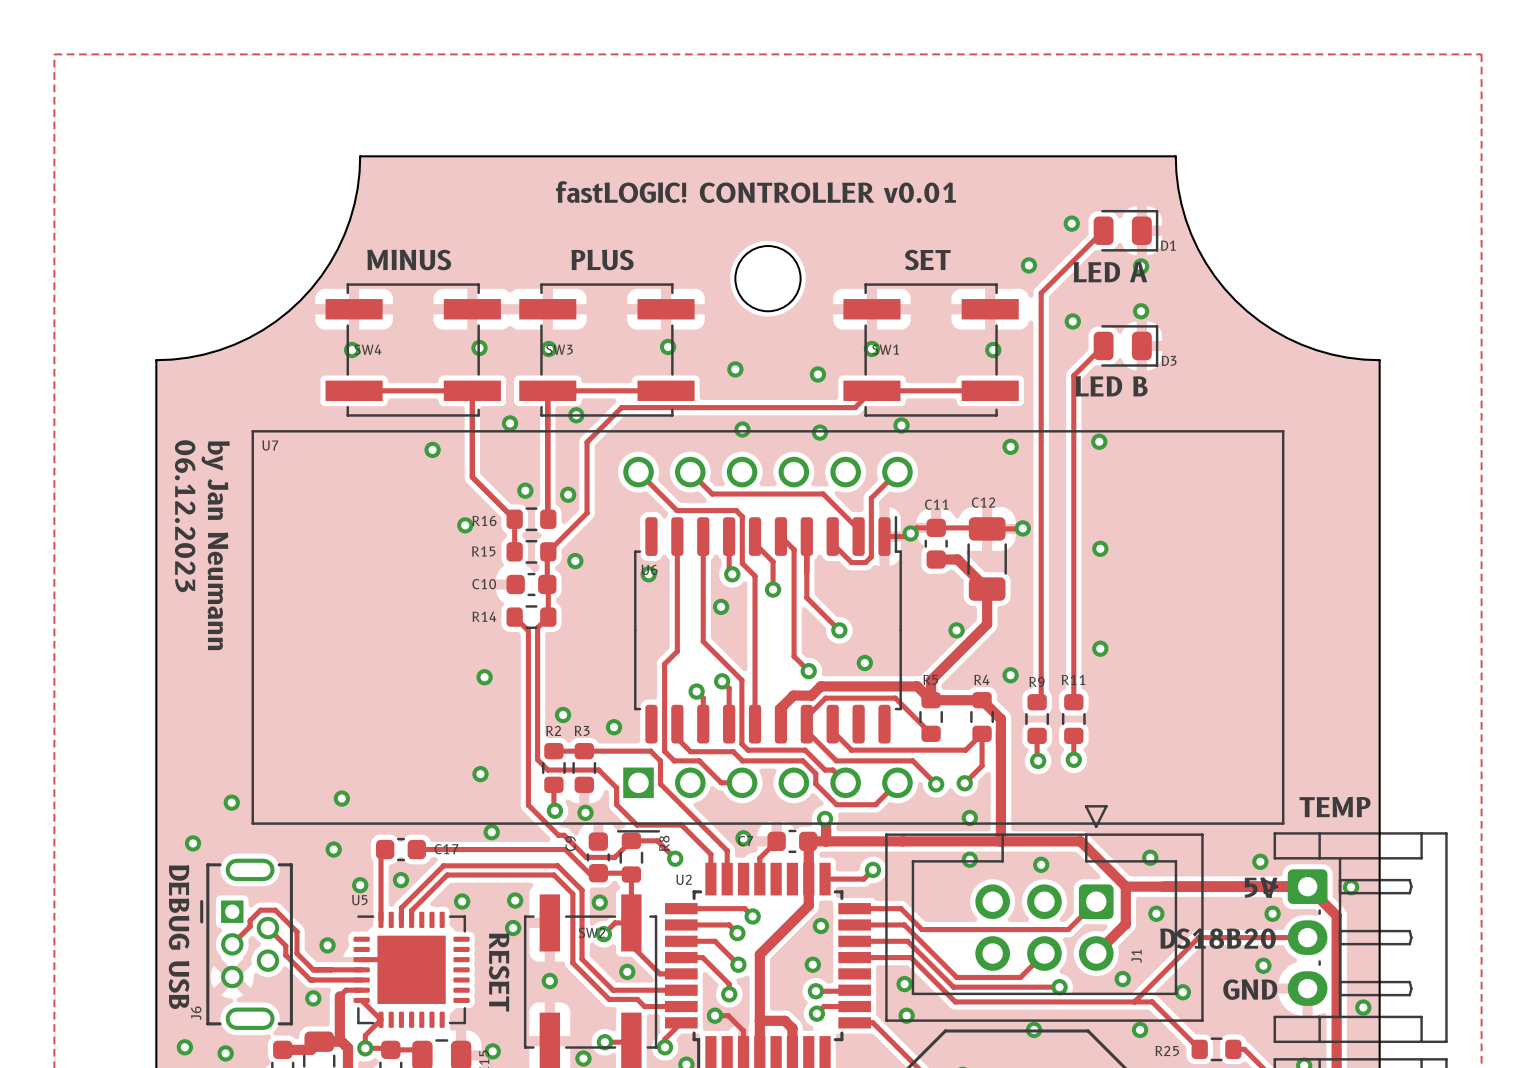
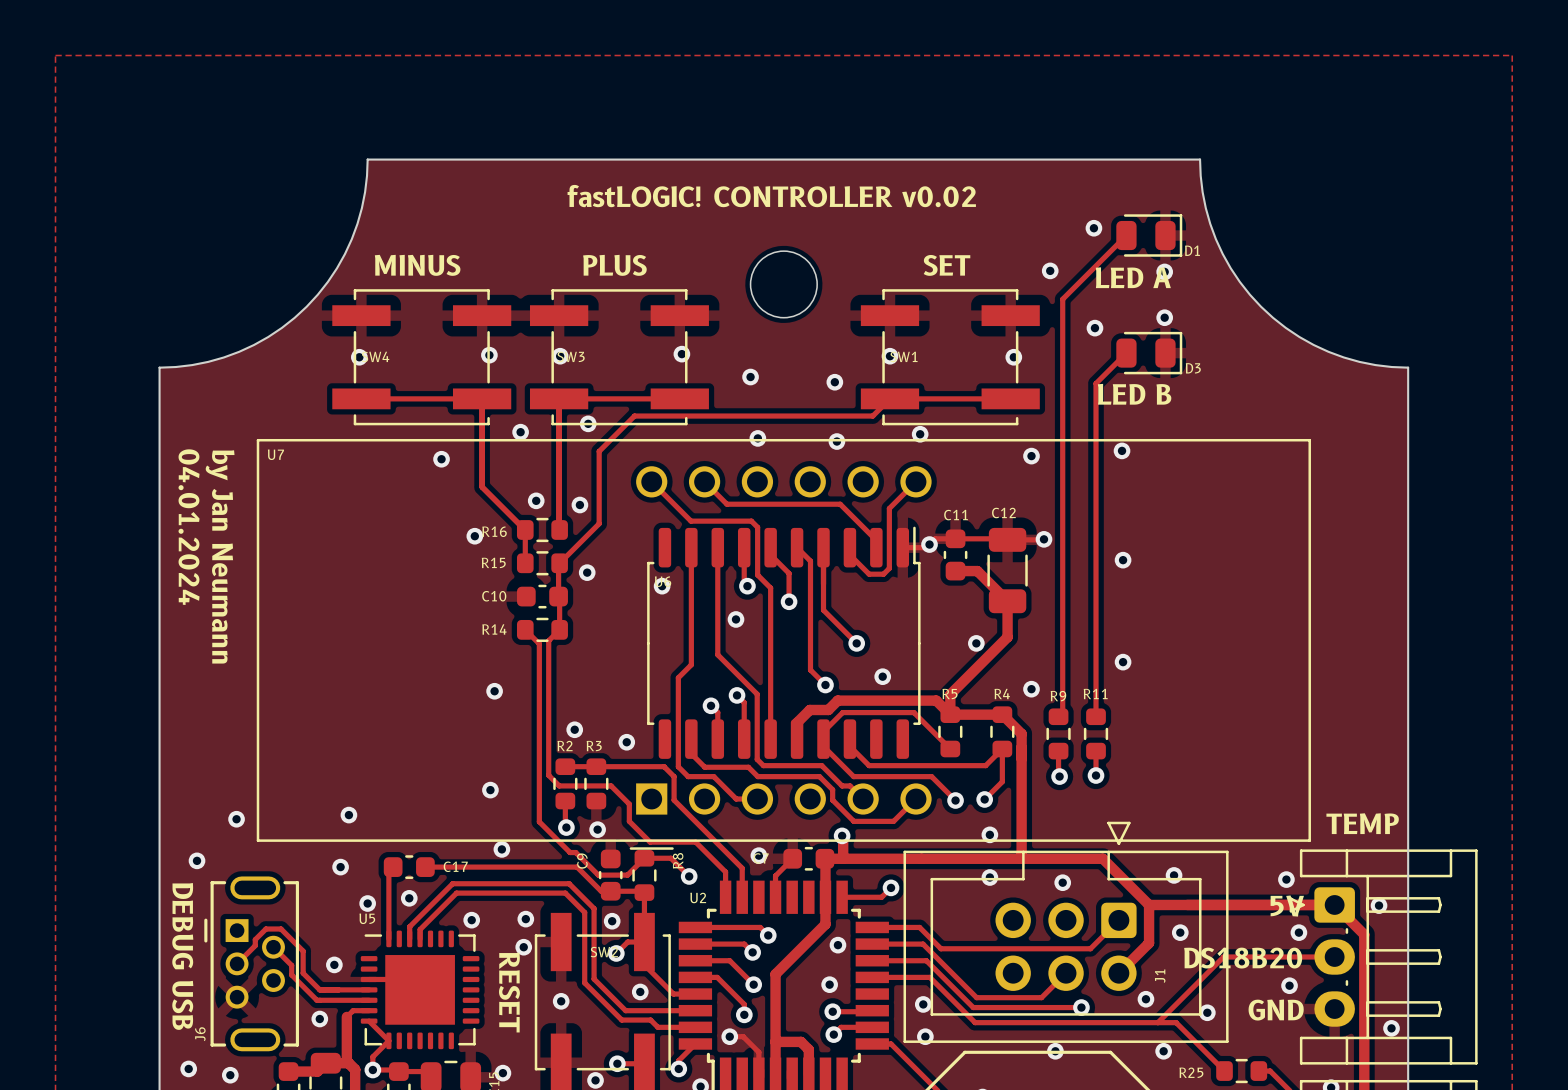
text: fastLOGIC! CONTROLLER v0.01 (756, 192) -> fastLOGIC! CONTROLLER v0.02 (771, 196)
text: 06.12.2023 (185, 516) -> 04.01.2024 (189, 527)

